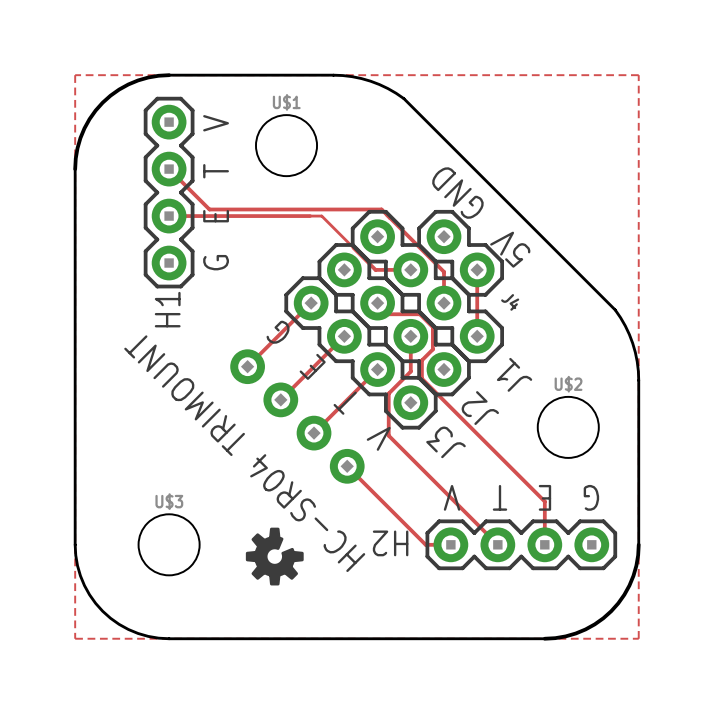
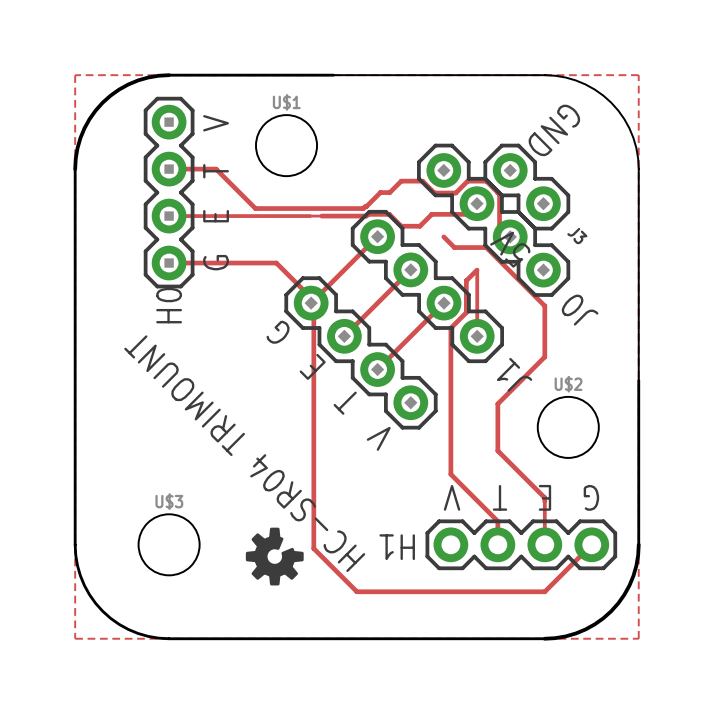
board edge: (333, 75) (352, 76) (370, 81) (387, 88) (403, 98) (615, 309) (625, 325) (632, 343) (637, 361) (638, 380) -> (333, 75) (555, 75) (585, 84) (611, 102) (629, 128) (638, 158) (638, 380)
track: (169, 169) (209, 209) (381, 209) (444, 271) (444, 303) -> (169, 169) (216, 169) (255, 208) (363, 208) (380, 192) (389, 192) (401, 181) (422, 181) (434, 193) (455, 193) (467, 181) (486, 181) (499, 194) (499, 226) (510, 236)
J3: none -> (526, 187)
text rotation: 0° (457, 193) -> 90° counterclockwise (554, 130)
text position: GND (457, 193) -> GND (554, 130)
track: (321, 216) (375, 269) (410, 269) -> (321, 216) (389, 214) (401, 226) (419, 226) (431, 214) (466, 214) (477, 203)
J0: none -> (493, 220)
J4: (460, 253) -> none
track: none -> (169, 263) (276, 263) (313, 300)
track: none -> (313, 300) (313, 548) (356, 591) (544, 591) (591, 544)
track: (311, 303) (247, 366) -> (377, 236) (313, 300)
track: (377, 303) (388, 314) (419, 314) (432, 327) (432, 349) (421, 360) (421, 378) (544, 501) -> (443, 236) (454, 247) (486, 247) (544, 306) (544, 356) (497, 403) (497, 450) (544, 497) (544, 501)
H1 value: none -> H0 (169, 305)
H1 name: H1 (167, 309) -> none
J2: (394, 319) -> none
track: (344, 336) (280, 399) -> (410, 270) (347, 333)
track: (410, 336) (410, 371) (388, 393) (388, 435) (497, 544) -> (477, 270) (466, 280) (466, 312) (450, 328) (450, 474) (497, 521) (497, 544)
track: (377, 369) (314, 433) -> (443, 303) (380, 366)
part: (297, 416) -> none
J3 name: J3 (446, 442) -> none
track: (347, 466) (425, 544) (450, 544) -> none
H2: (521, 544) -> none
part: none -> H1 (521, 544)

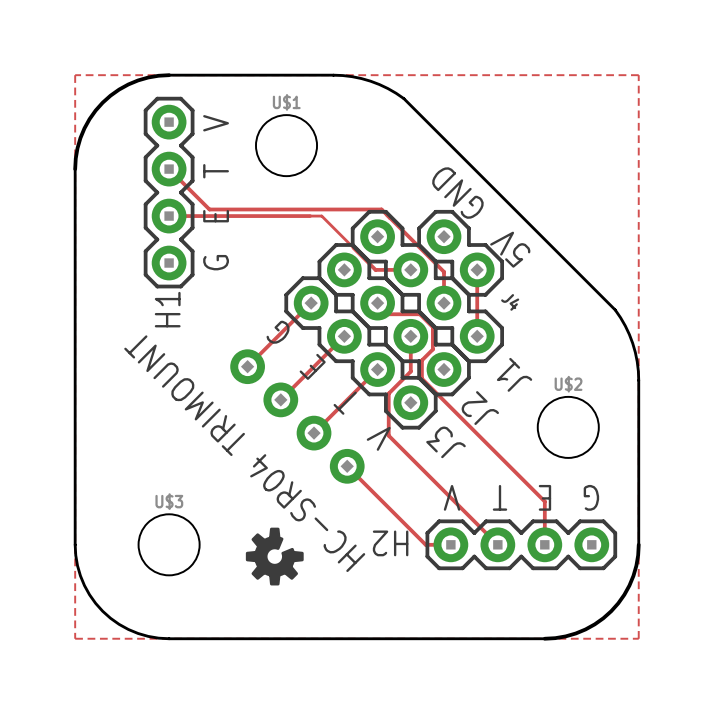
board edge: (333, 75) (555, 75) (585, 84) (611, 102) (629, 128) (638, 158) (638, 380) -> (333, 75) (352, 76) (370, 81) (387, 88) (403, 98) (615, 309) (625, 325) (632, 343) (637, 361) (638, 380)
text rotation: 0° (554, 130) -> 90° clockwise (457, 193)
text position: GND (554, 130) -> GND (457, 193)
track: (169, 169) (216, 169) (255, 208) (363, 208) (380, 192) (389, 192) (401, 181) (422, 181) (434, 193) (455, 193) (467, 181) (486, 181) (499, 194) (499, 226) (510, 236) -> (169, 169) (209, 209) (381, 209) (444, 271) (444, 303)
J3: (526, 187) -> none
track: (477, 203) (466, 214) (431, 214) (419, 226) (401, 226) (389, 214) (321, 216) -> (410, 269) (375, 269) (321, 216)
J0: (493, 220) -> none
track: (377, 236) (313, 300) -> (311, 303) (247, 366)
track: (443, 236) (454, 247) (486, 247) (544, 306) (544, 356) (497, 403) (497, 450) (544, 497) (544, 501) -> (377, 303) (388, 314) (419, 314) (432, 327) (432, 349) (421, 360) (421, 378) (544, 501)
J4: none -> (460, 253)
track: (169, 263) (276, 263) (313, 300) -> none
track: (410, 270) (347, 333) -> (344, 336) (280, 399)
track: (477, 270) (466, 280) (466, 312) (450, 328) (450, 474) (497, 521) (497, 544) -> (410, 336) (410, 371) (388, 393) (388, 435) (497, 544)
track: (313, 300) (313, 548) (356, 591) (544, 591) (591, 544) -> none
track: (443, 303) (380, 366) -> (377, 369) (314, 433)
H1 value: H0 (169, 305) -> none
H1 name: none -> H1 (167, 309)
J2: none -> (394, 319)
part: none -> (297, 416)
J3 name: none -> J3 (446, 442)
track: none -> (347, 466) (425, 544) (450, 544)
part: H1 (521, 544) -> none
H2: none -> (521, 544)

